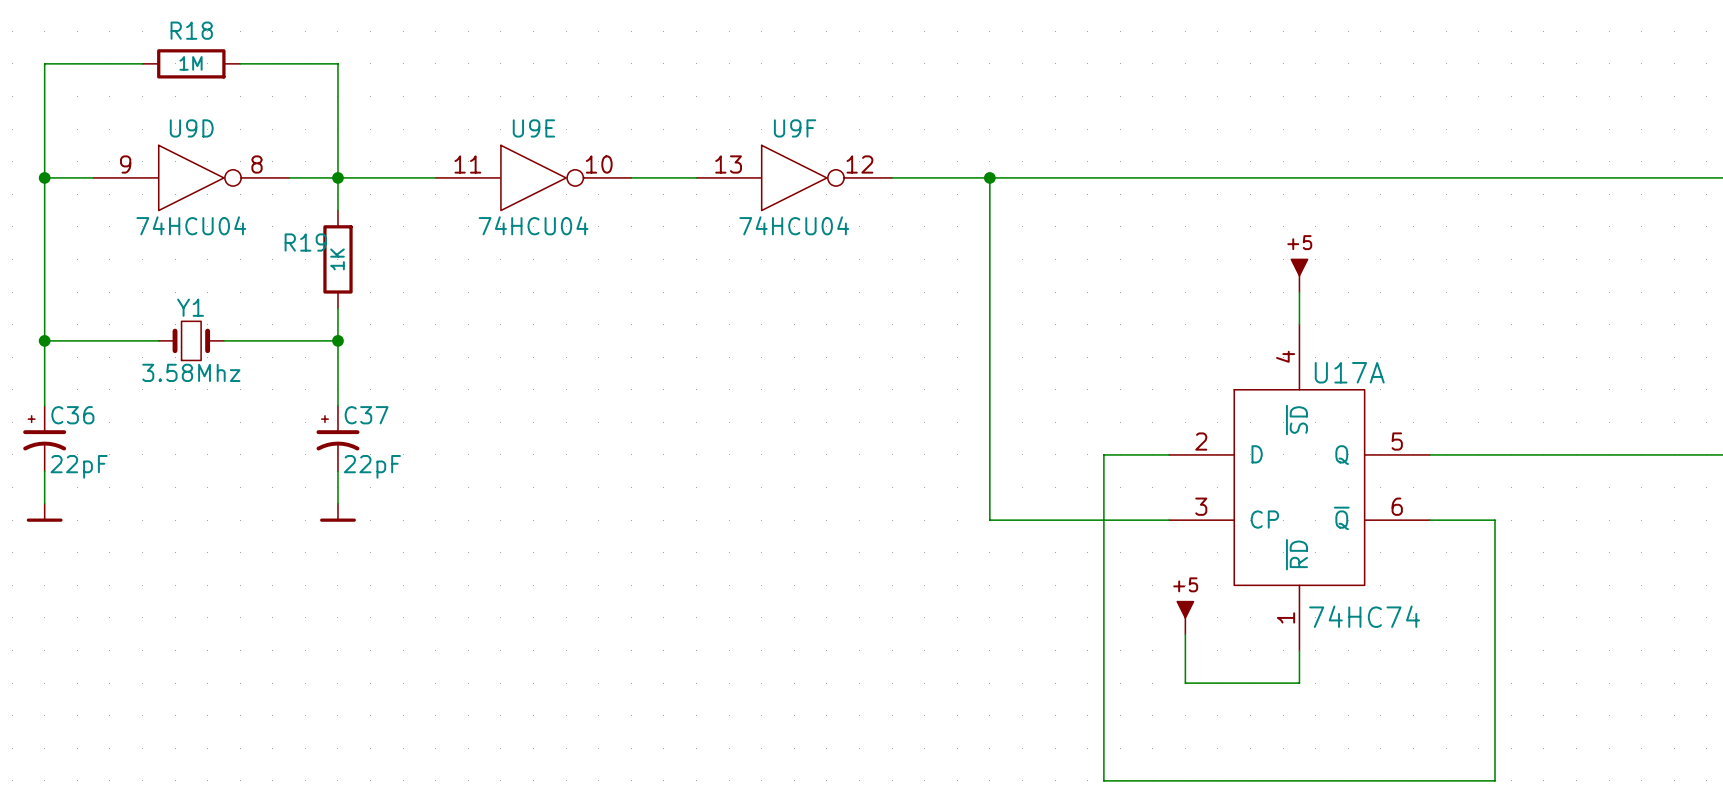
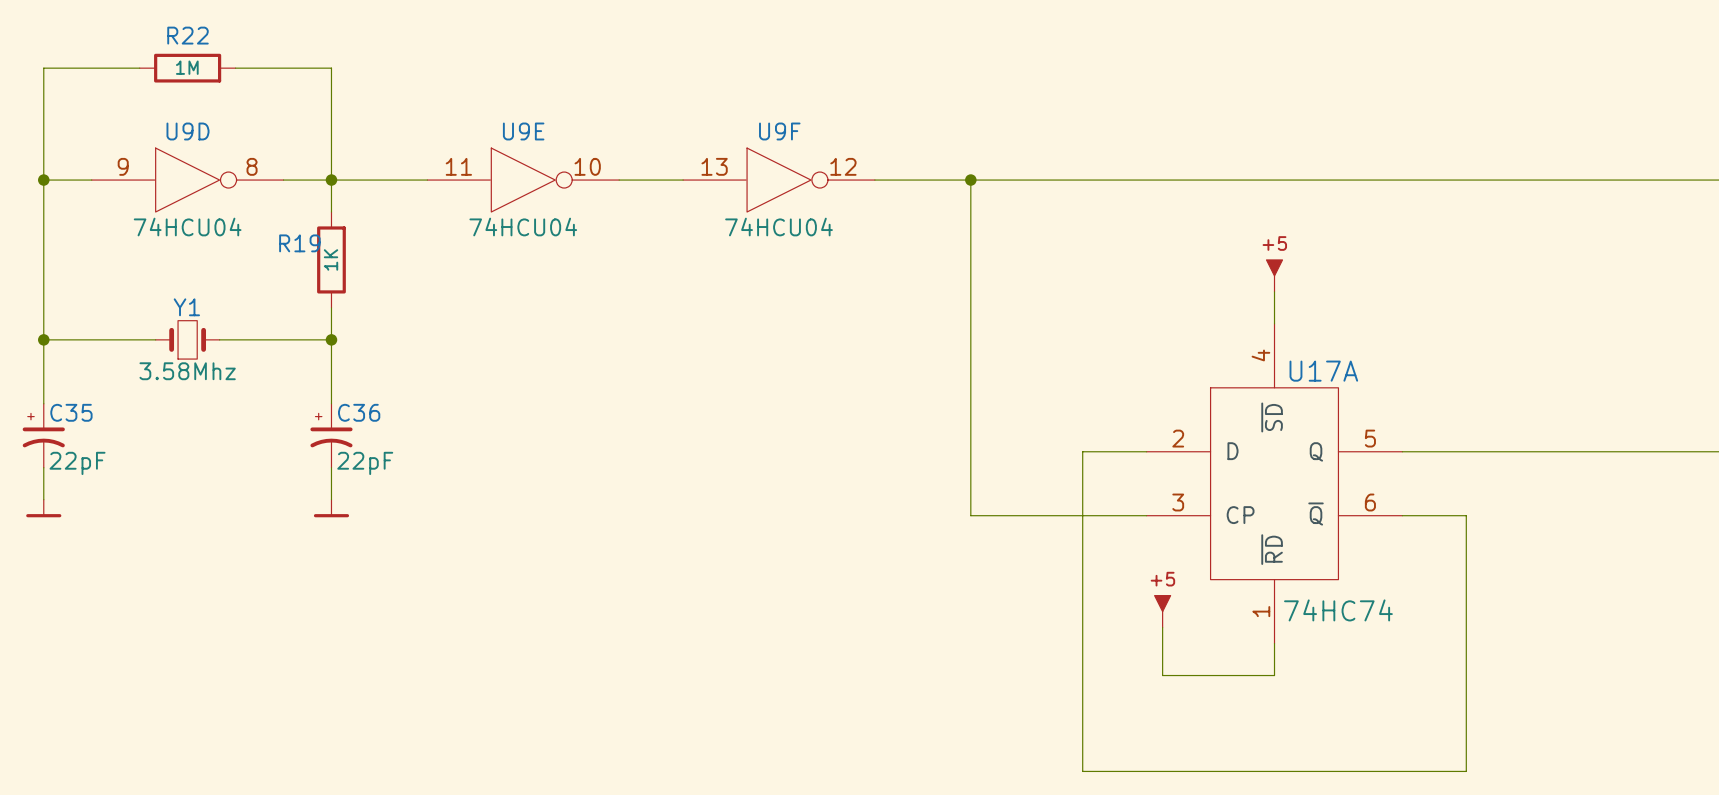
R18 name: R18 (191, 30) -> R22 (188, 35)
C36 name: C36 (72, 415) -> C35 (71, 412)
C37 name: C37 (366, 415) -> C36 (359, 412)

